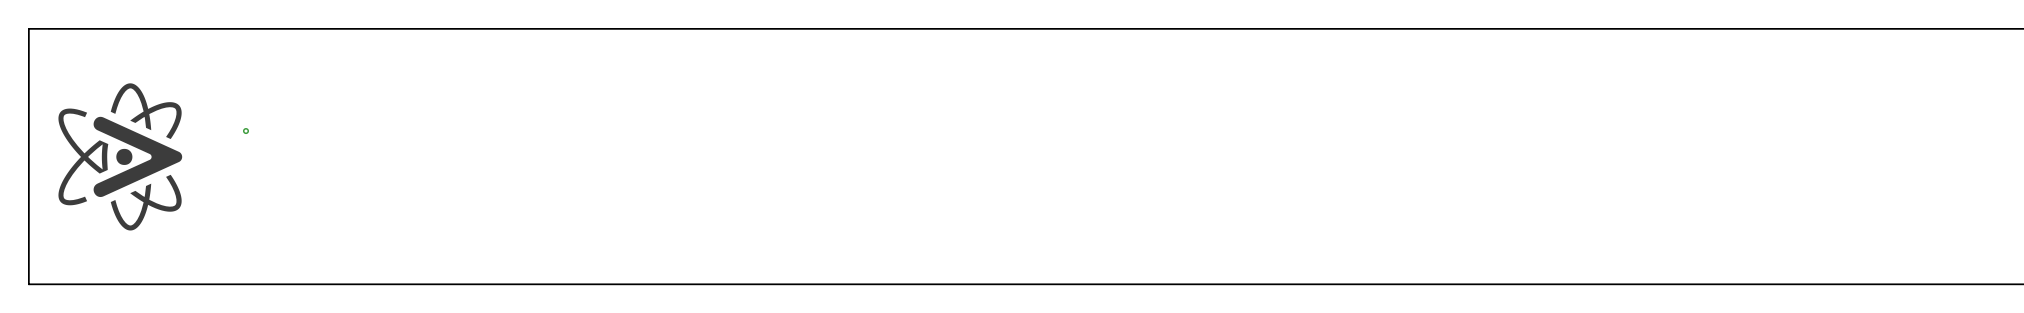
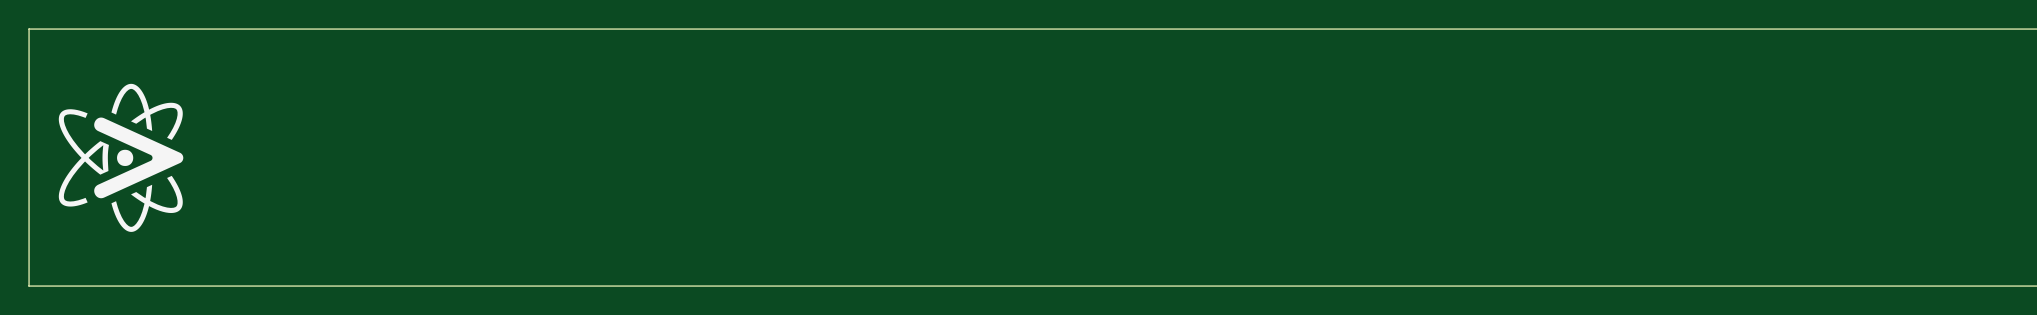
via: (245, 131) -> none

